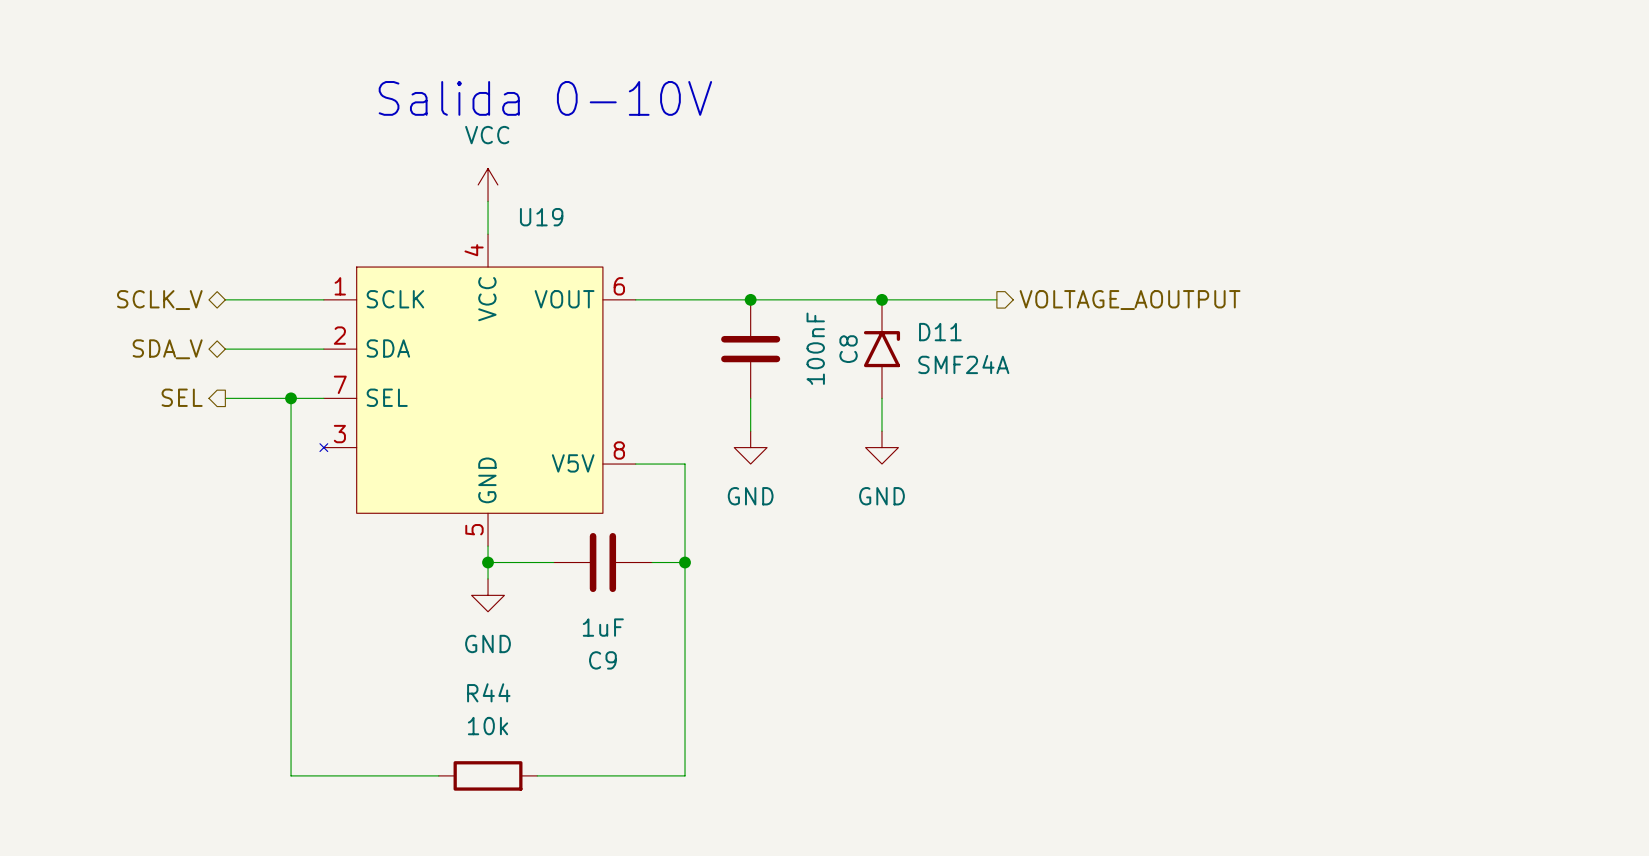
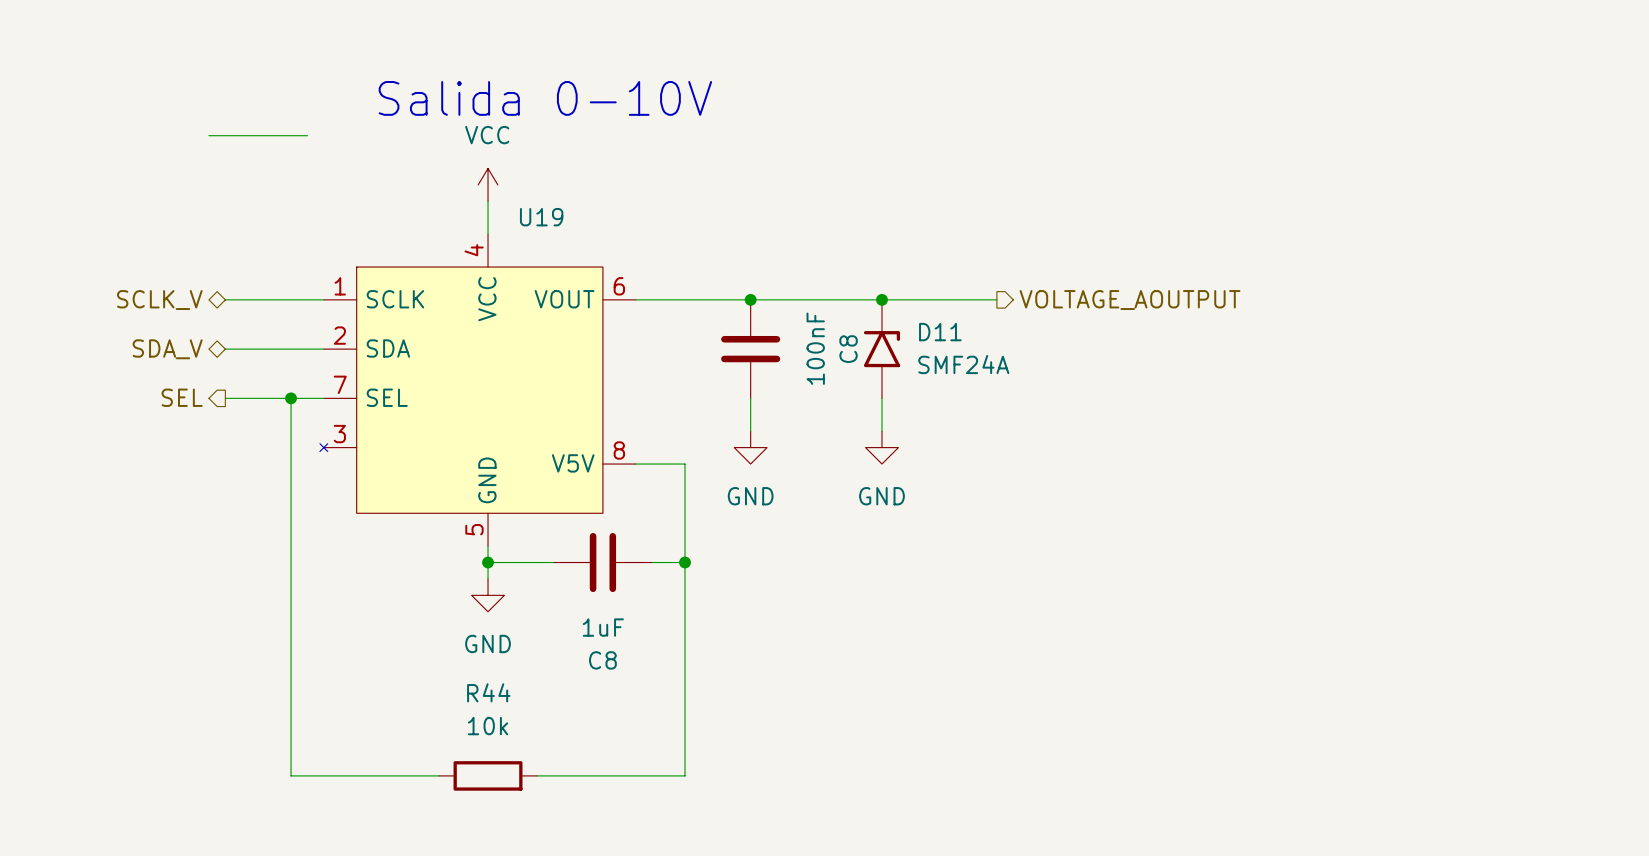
wire: none -> (208, 135) (307, 135)
C9 name: C9 (602, 660) -> C8 (602, 660)

